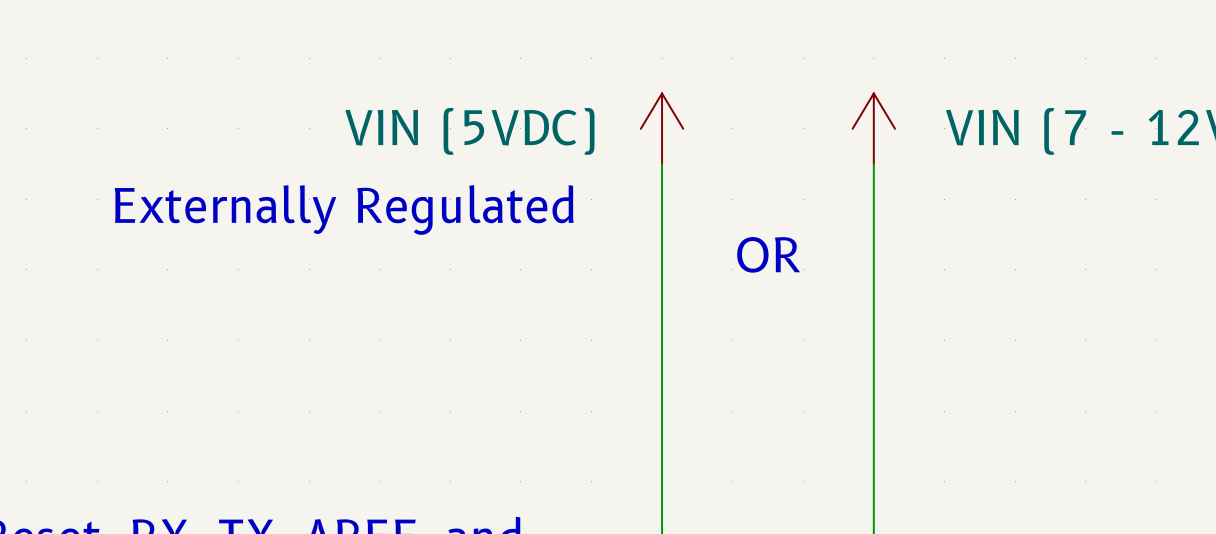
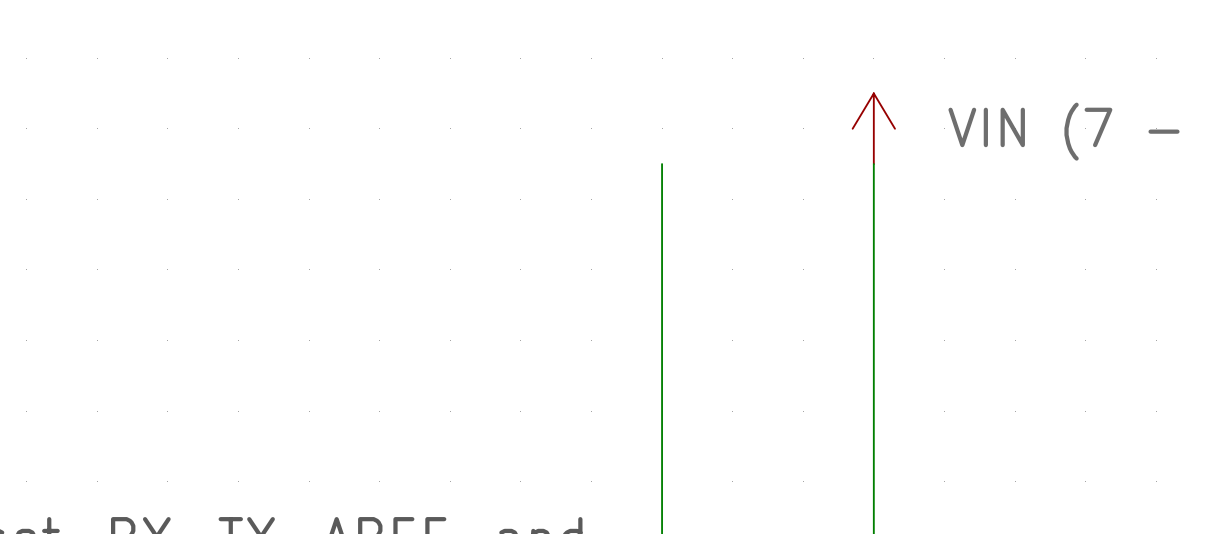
power symbol: VIN (5VDC) (662, 128) -> none
text: Externally Regulated (344, 210) -> none
text: OR (768, 254) -> none

